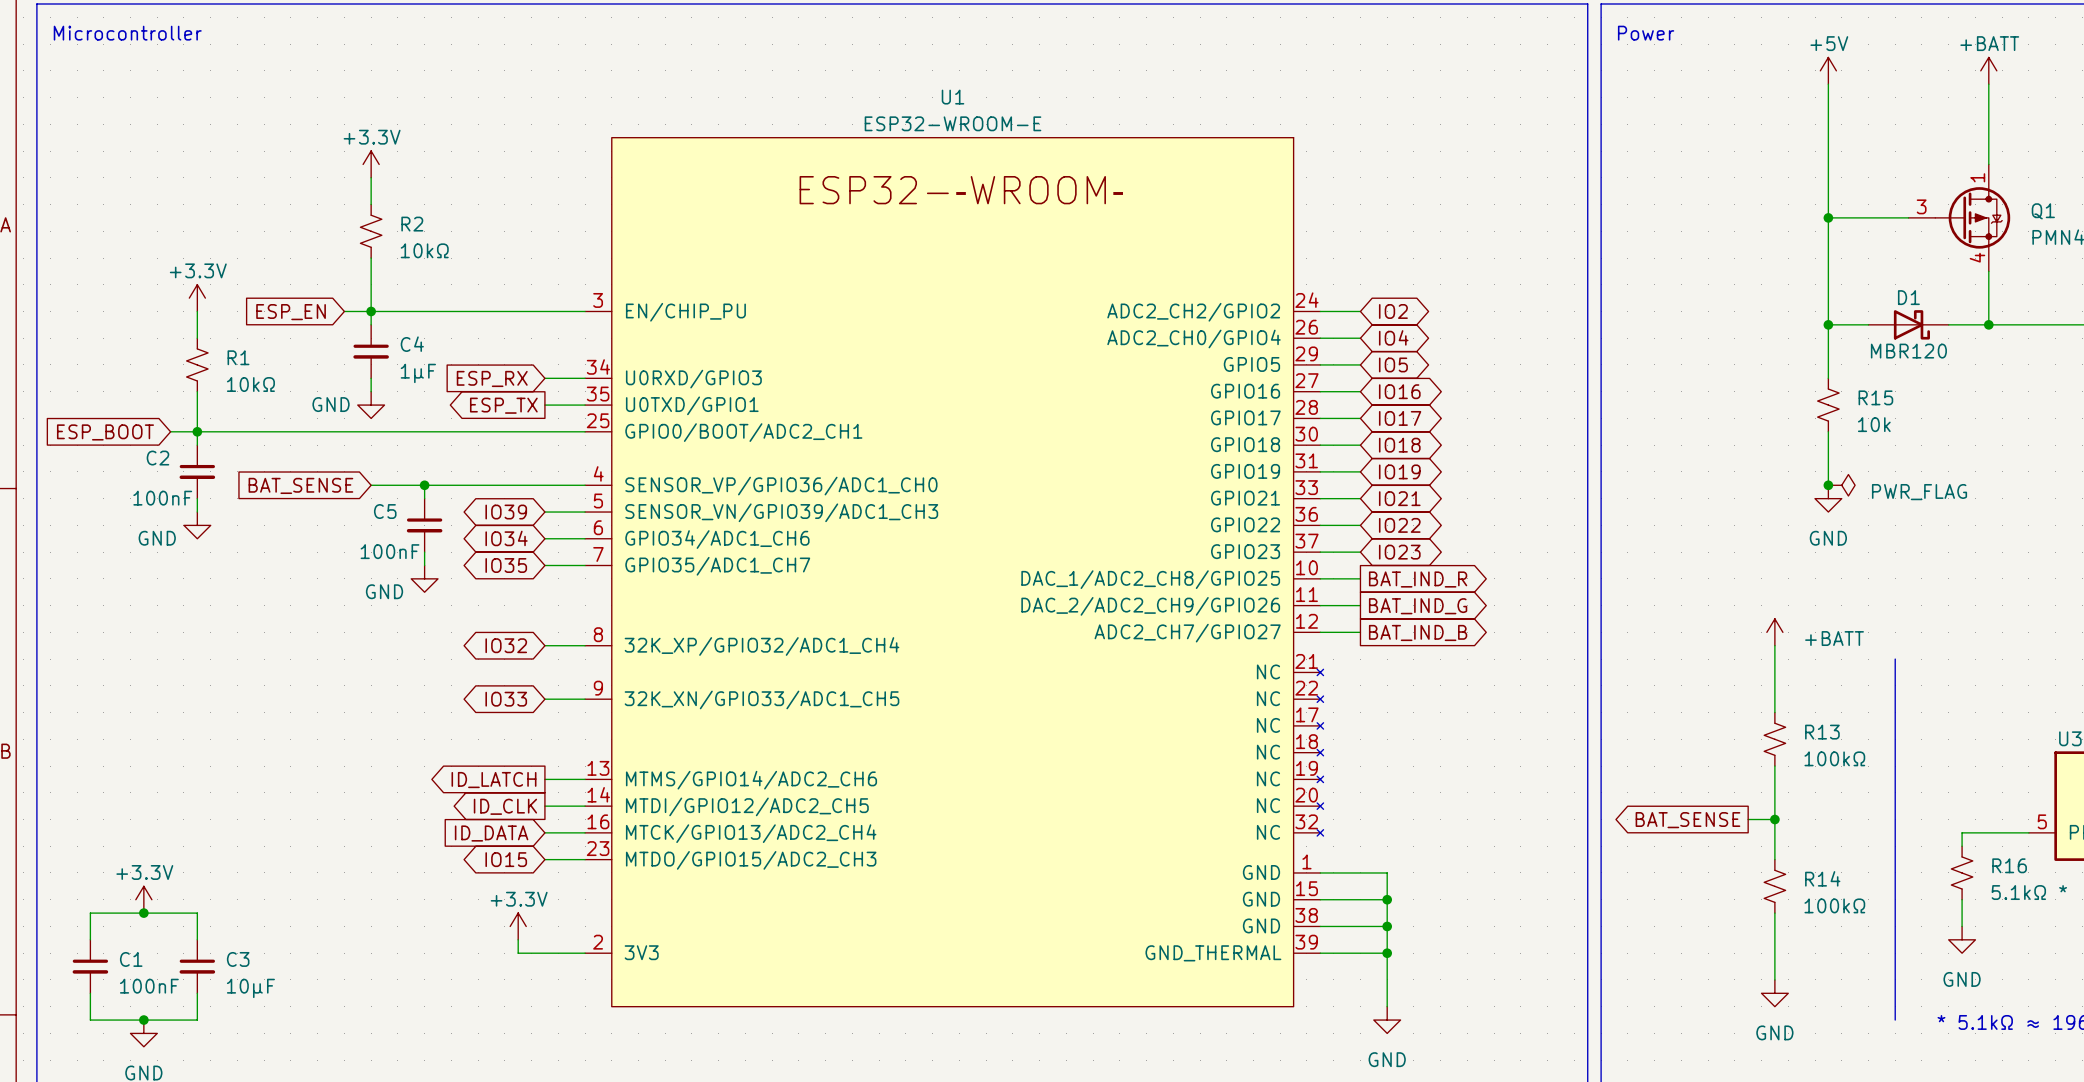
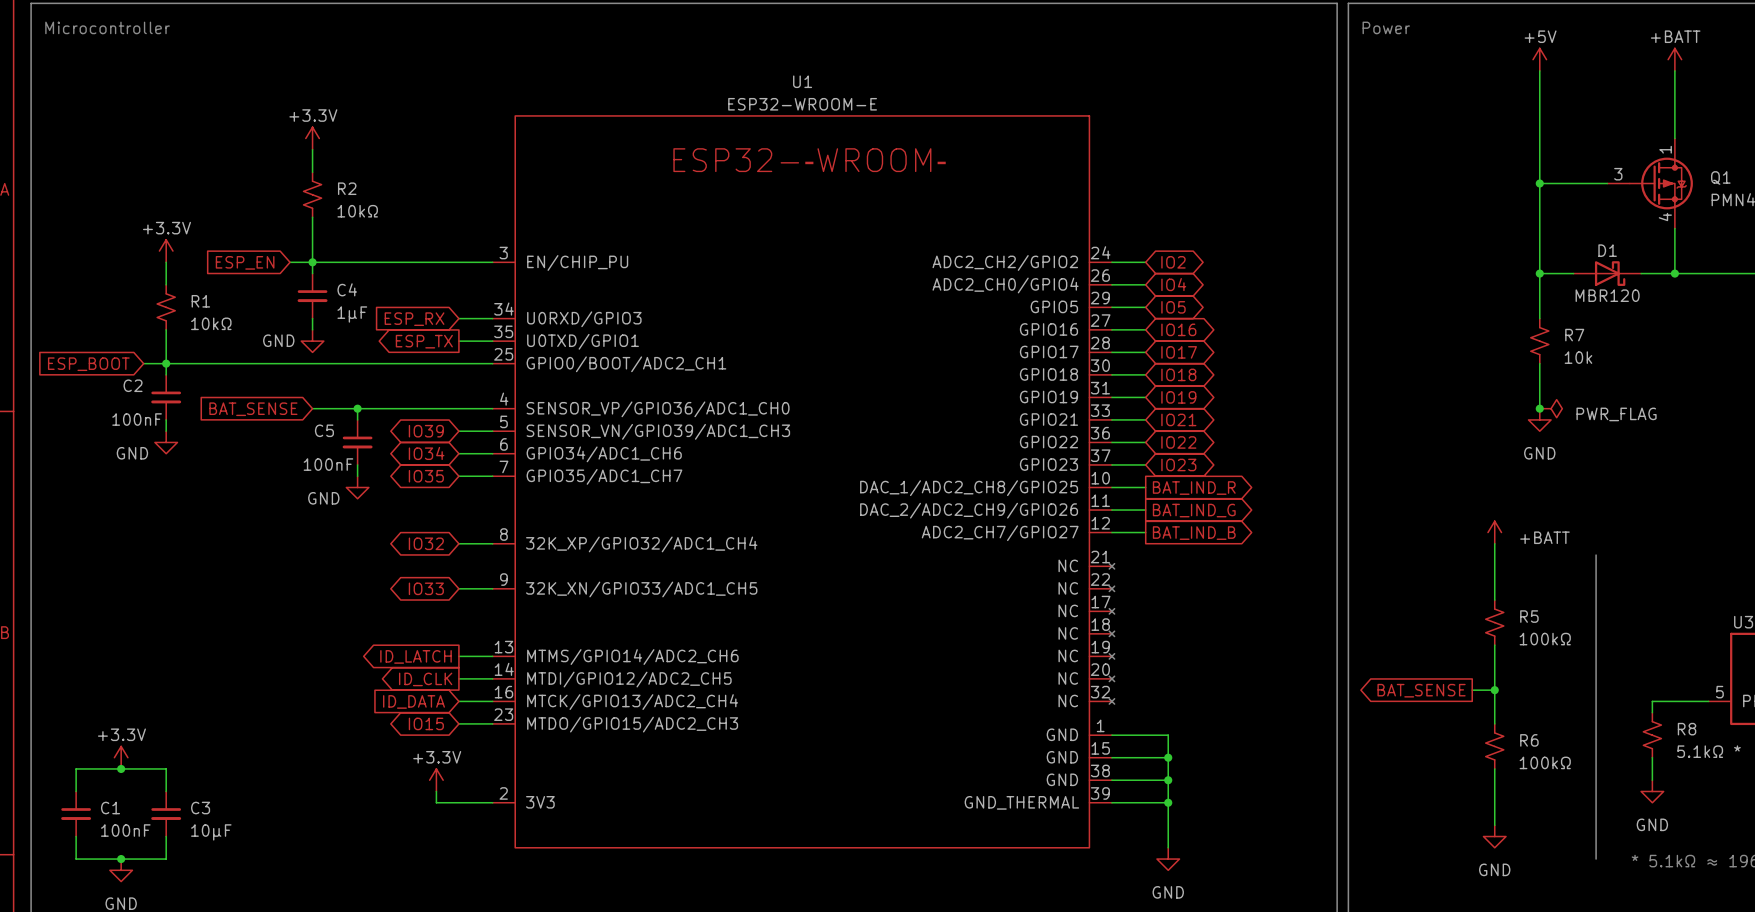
R15 name: R15 (1875, 397) -> R7 (1574, 335)
R13 name: R13 (1822, 732) -> R5 (1529, 616)
R16 name: R16 (2009, 865) -> R8 (1687, 729)
R14 name: R14 (1822, 878) -> R6 (1529, 740)

